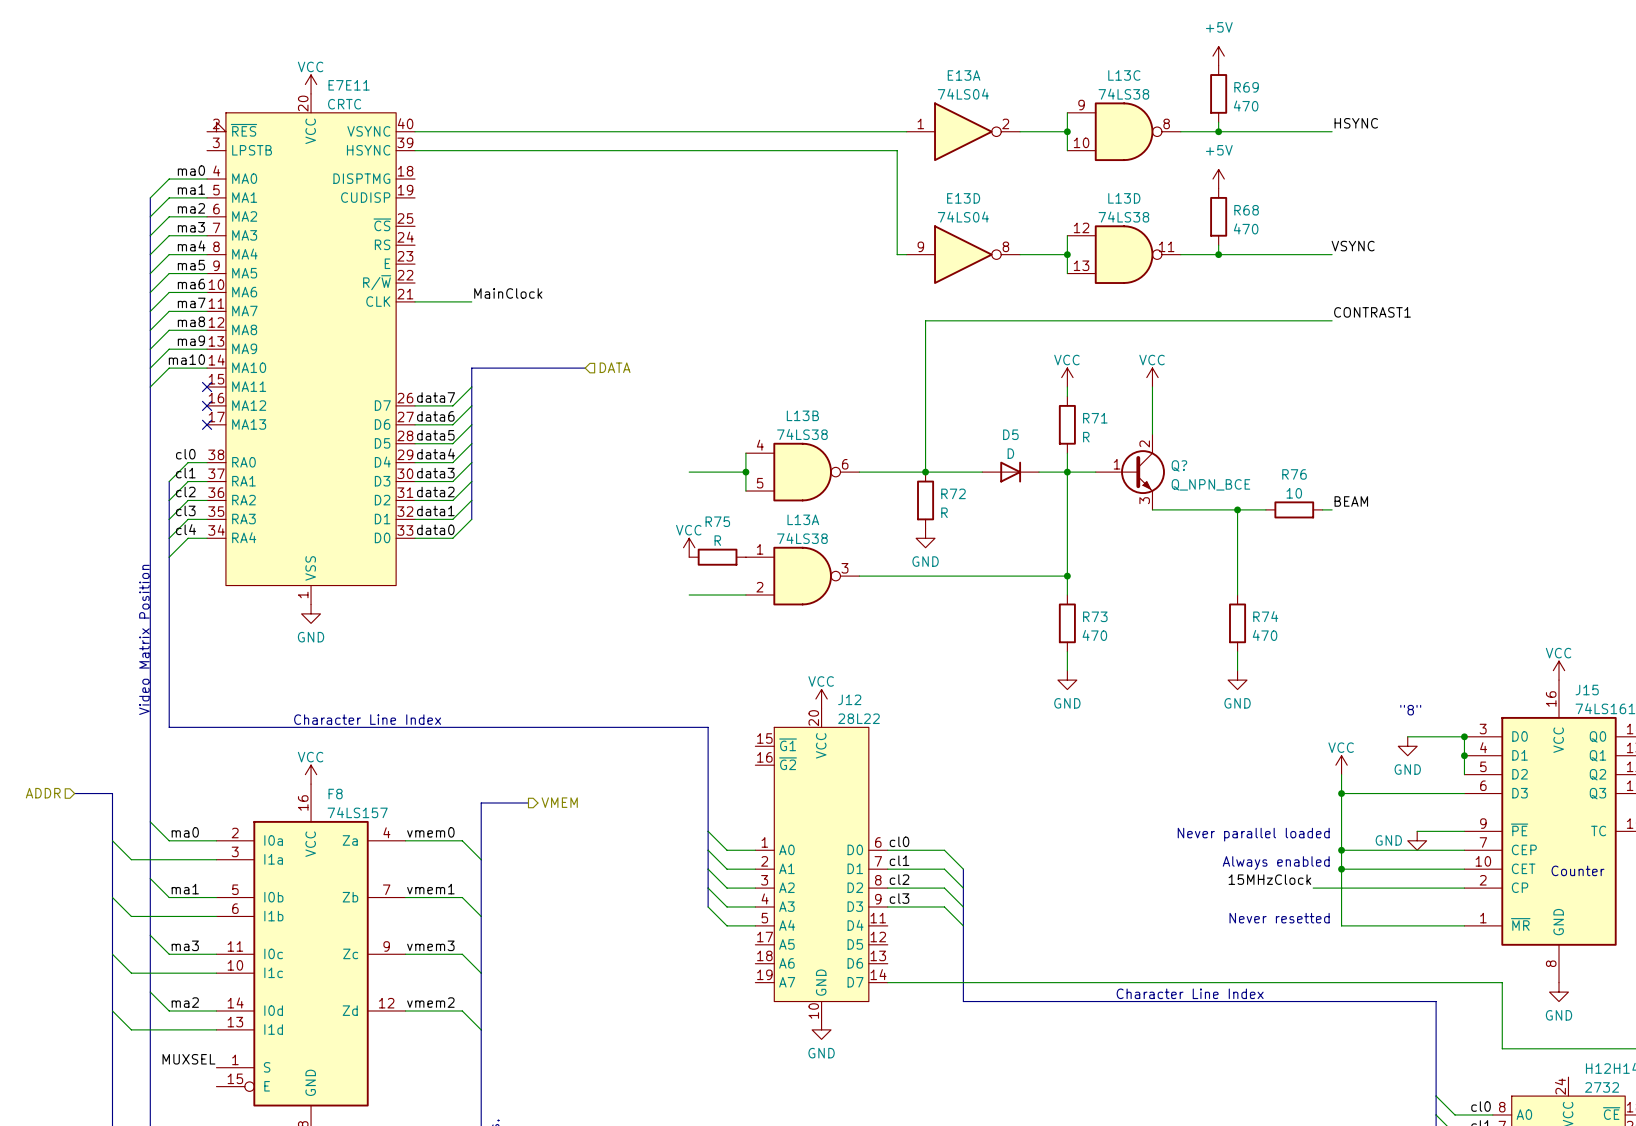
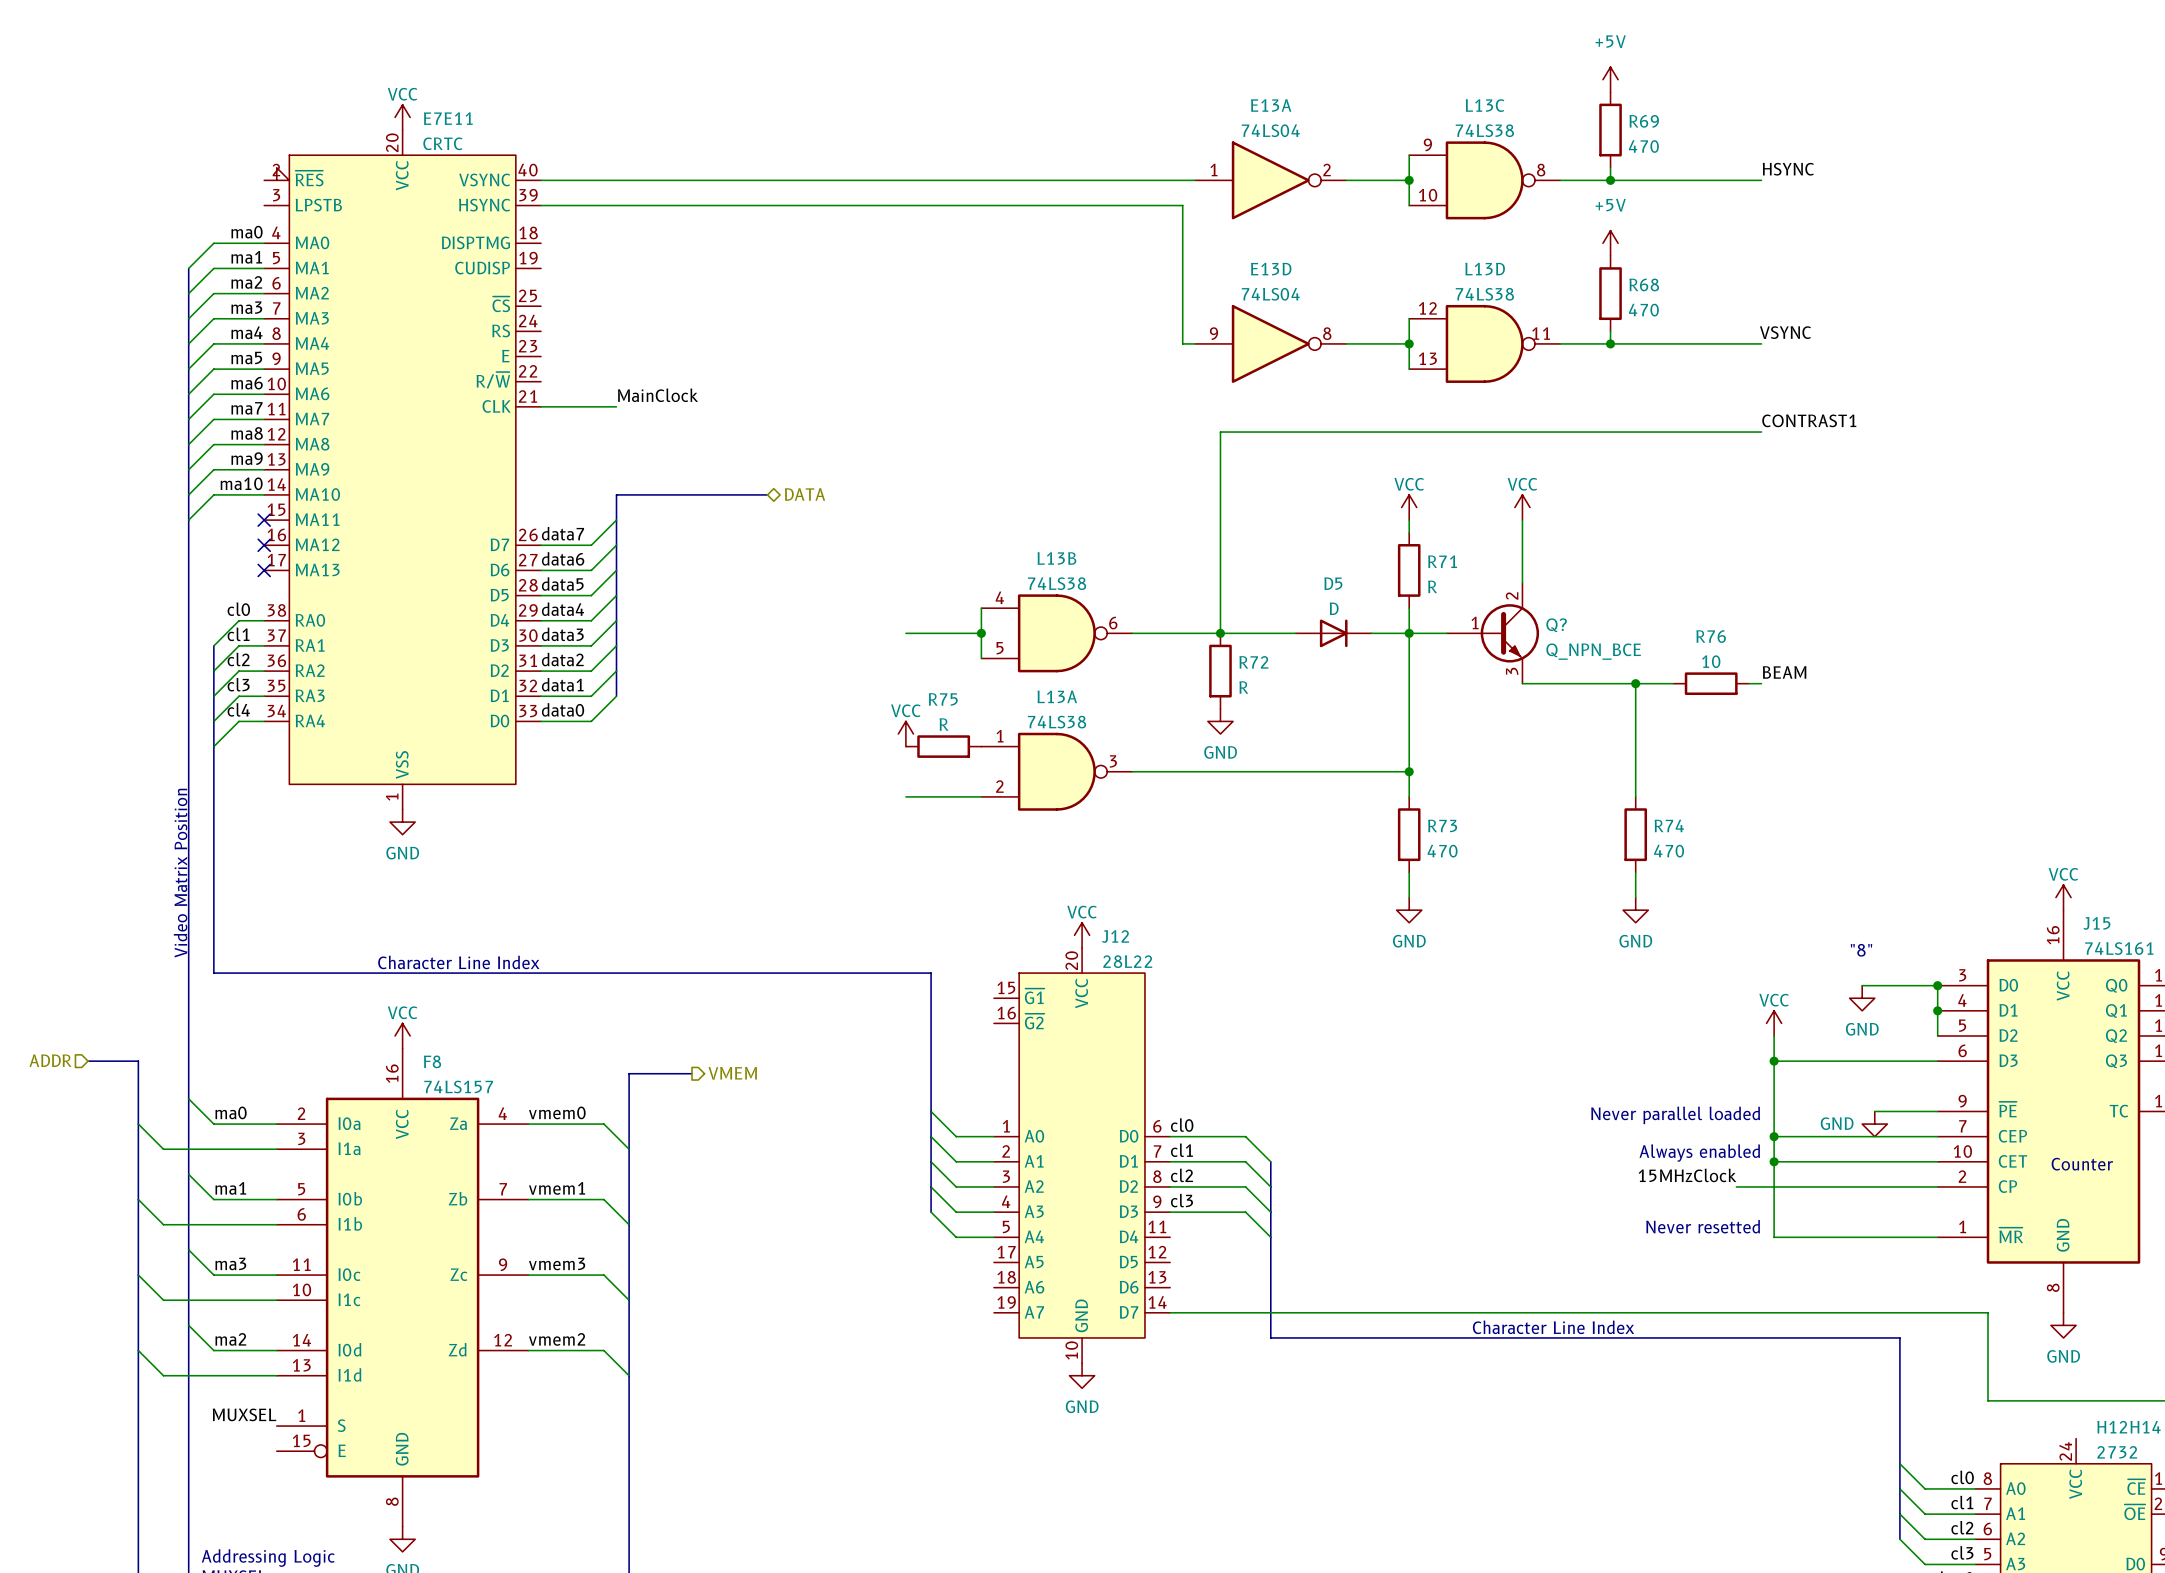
hierarchical label shape: input (615, 367) -> bidirectional (805, 494)

